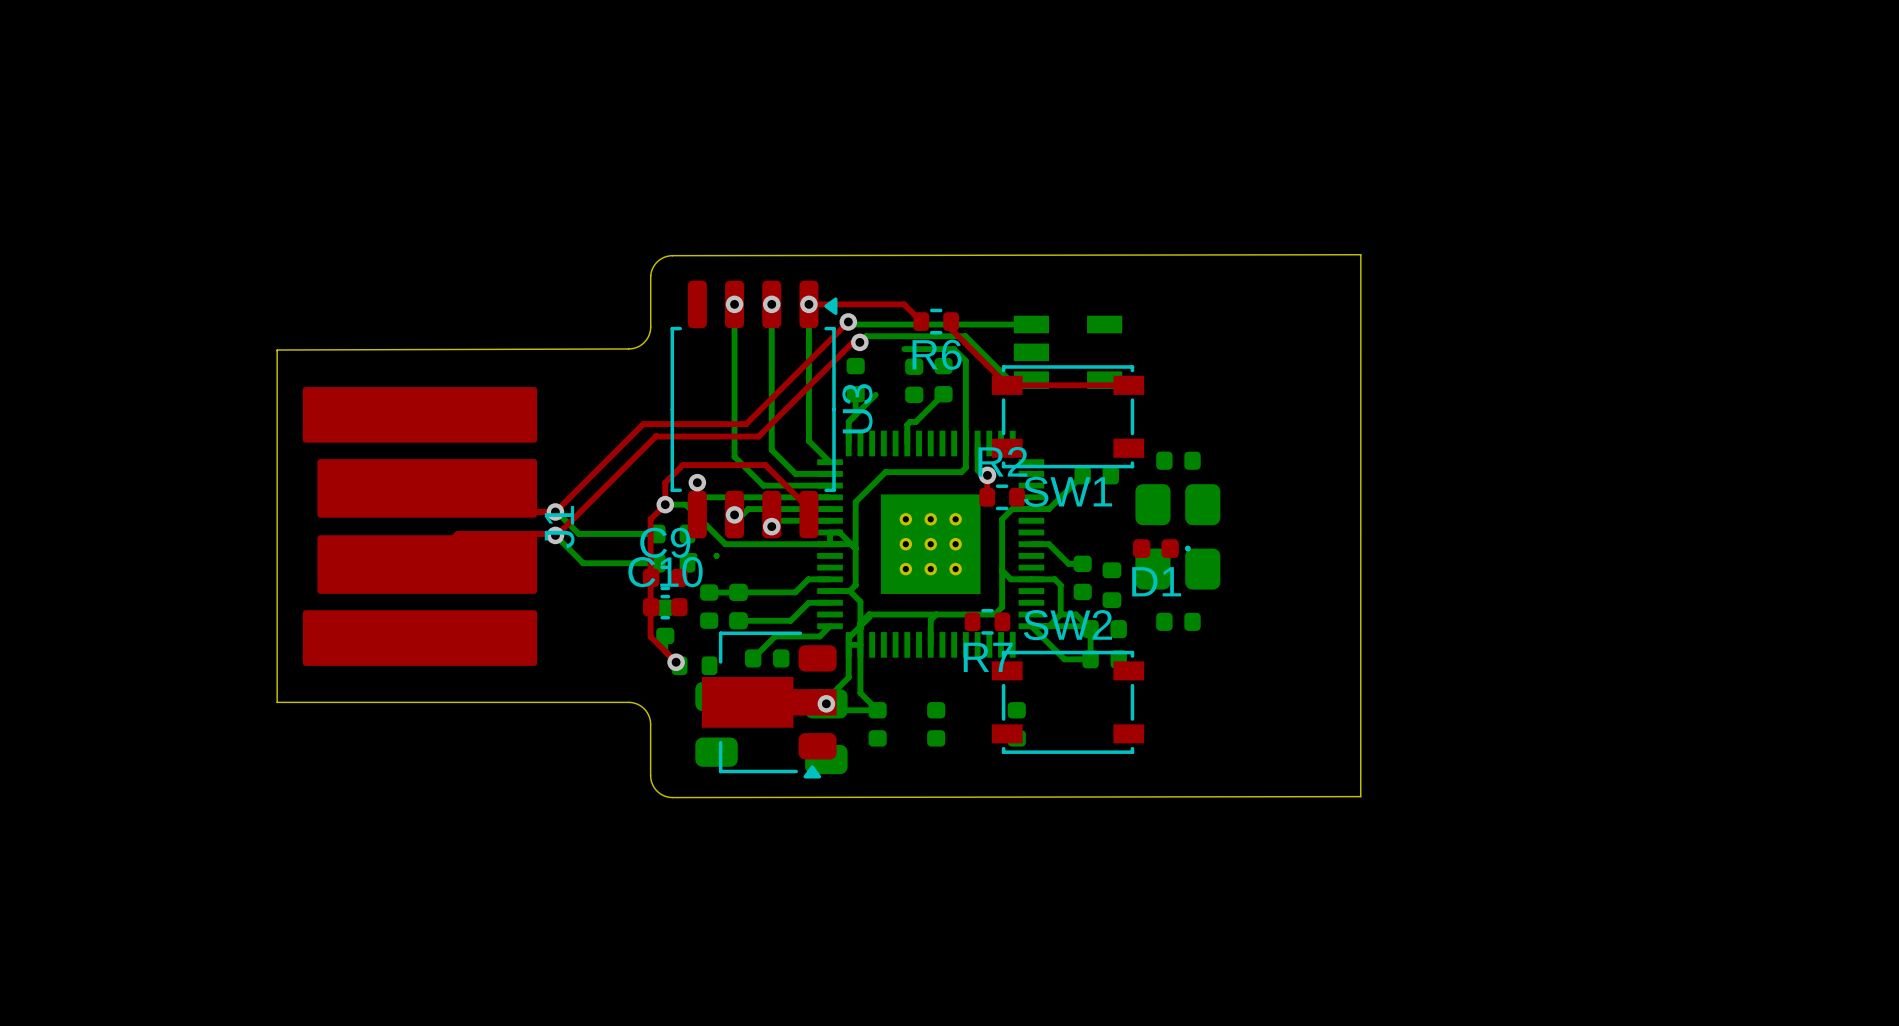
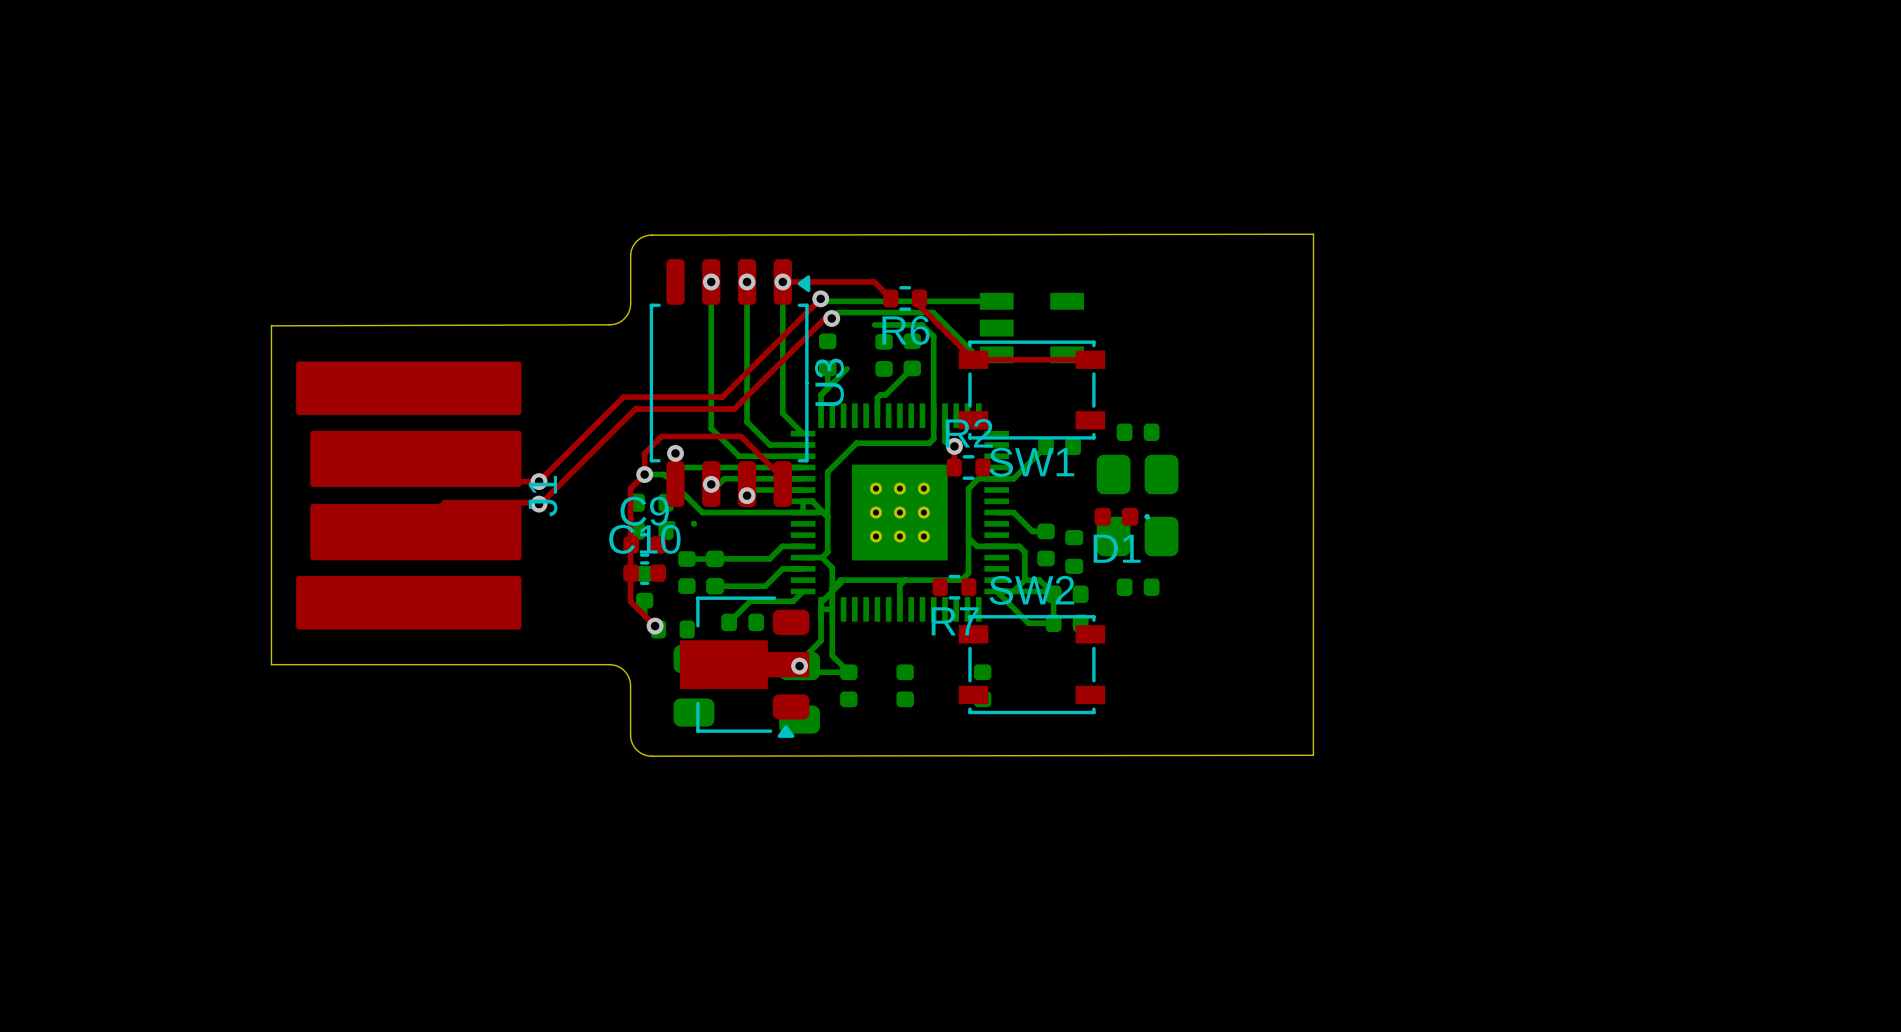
bottom track: (555, 511) (578, 533) (657, 533) -> none
bottom track: (555, 535) (583, 563) (657, 563) -> none

